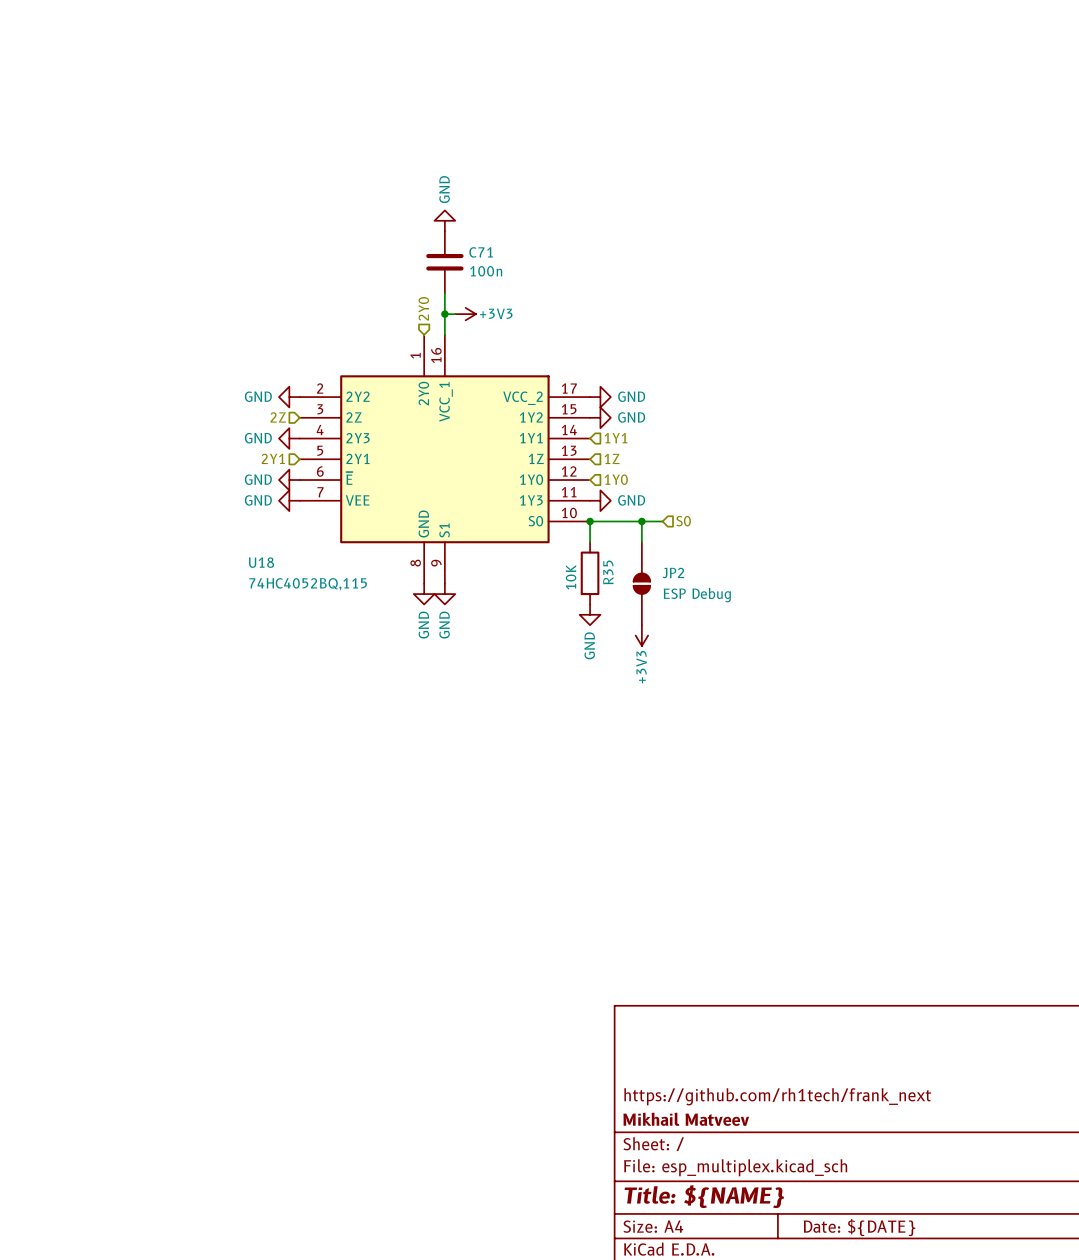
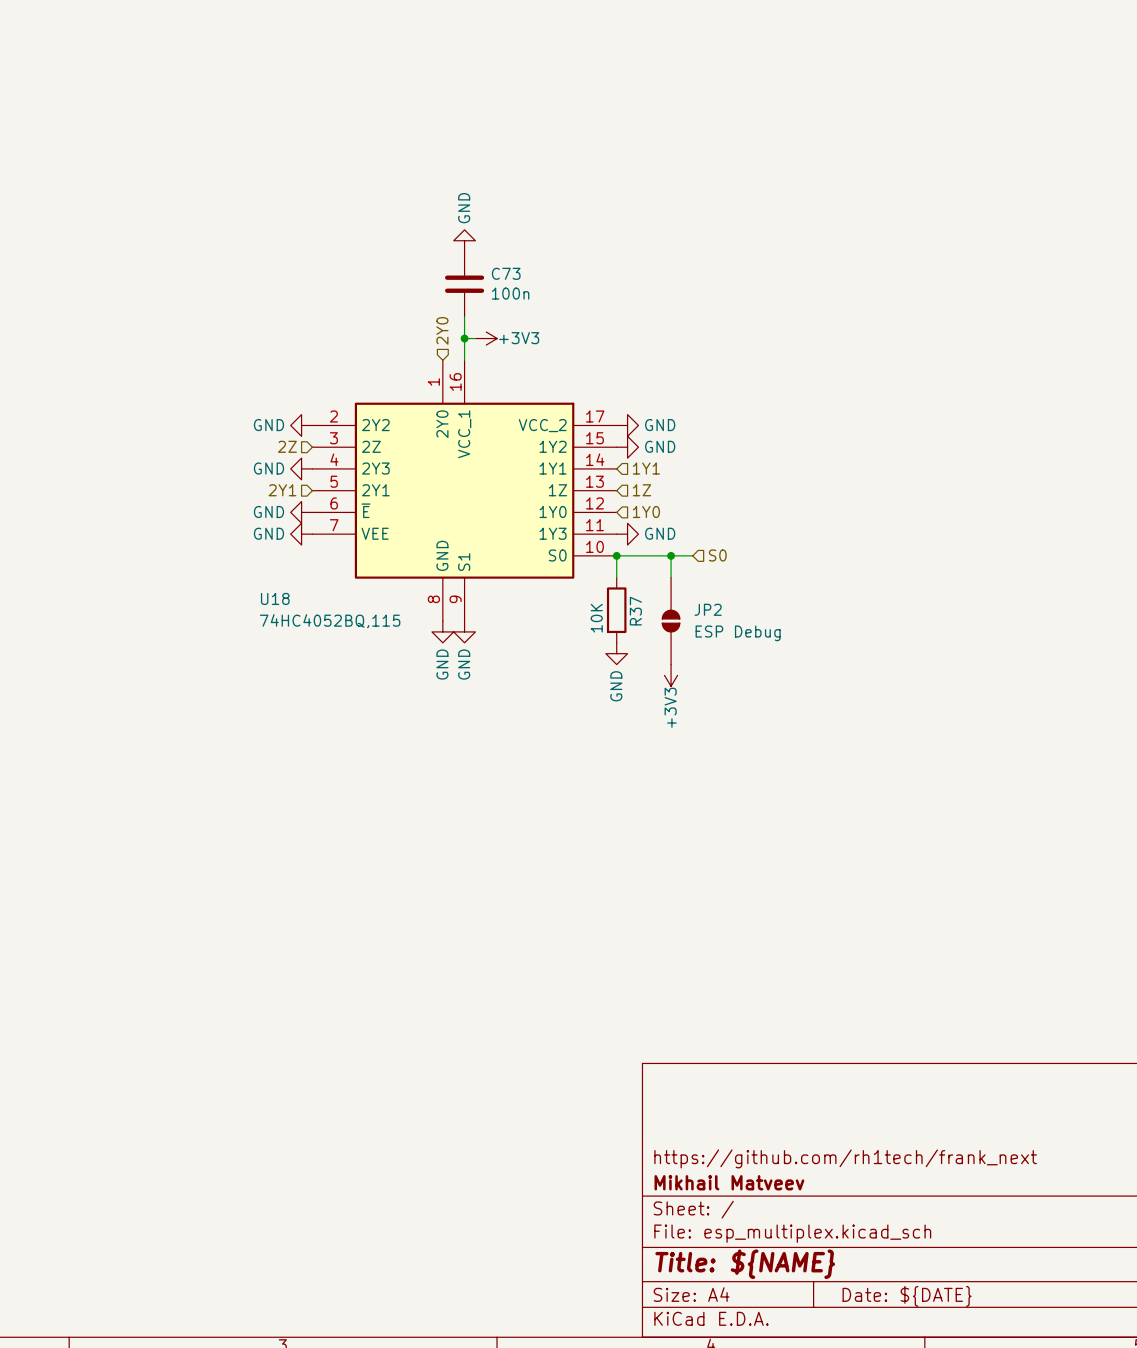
C71 name: C71 (481, 252) -> C73 (506, 273)
R35 name: R35 (608, 572) -> R37 (635, 611)

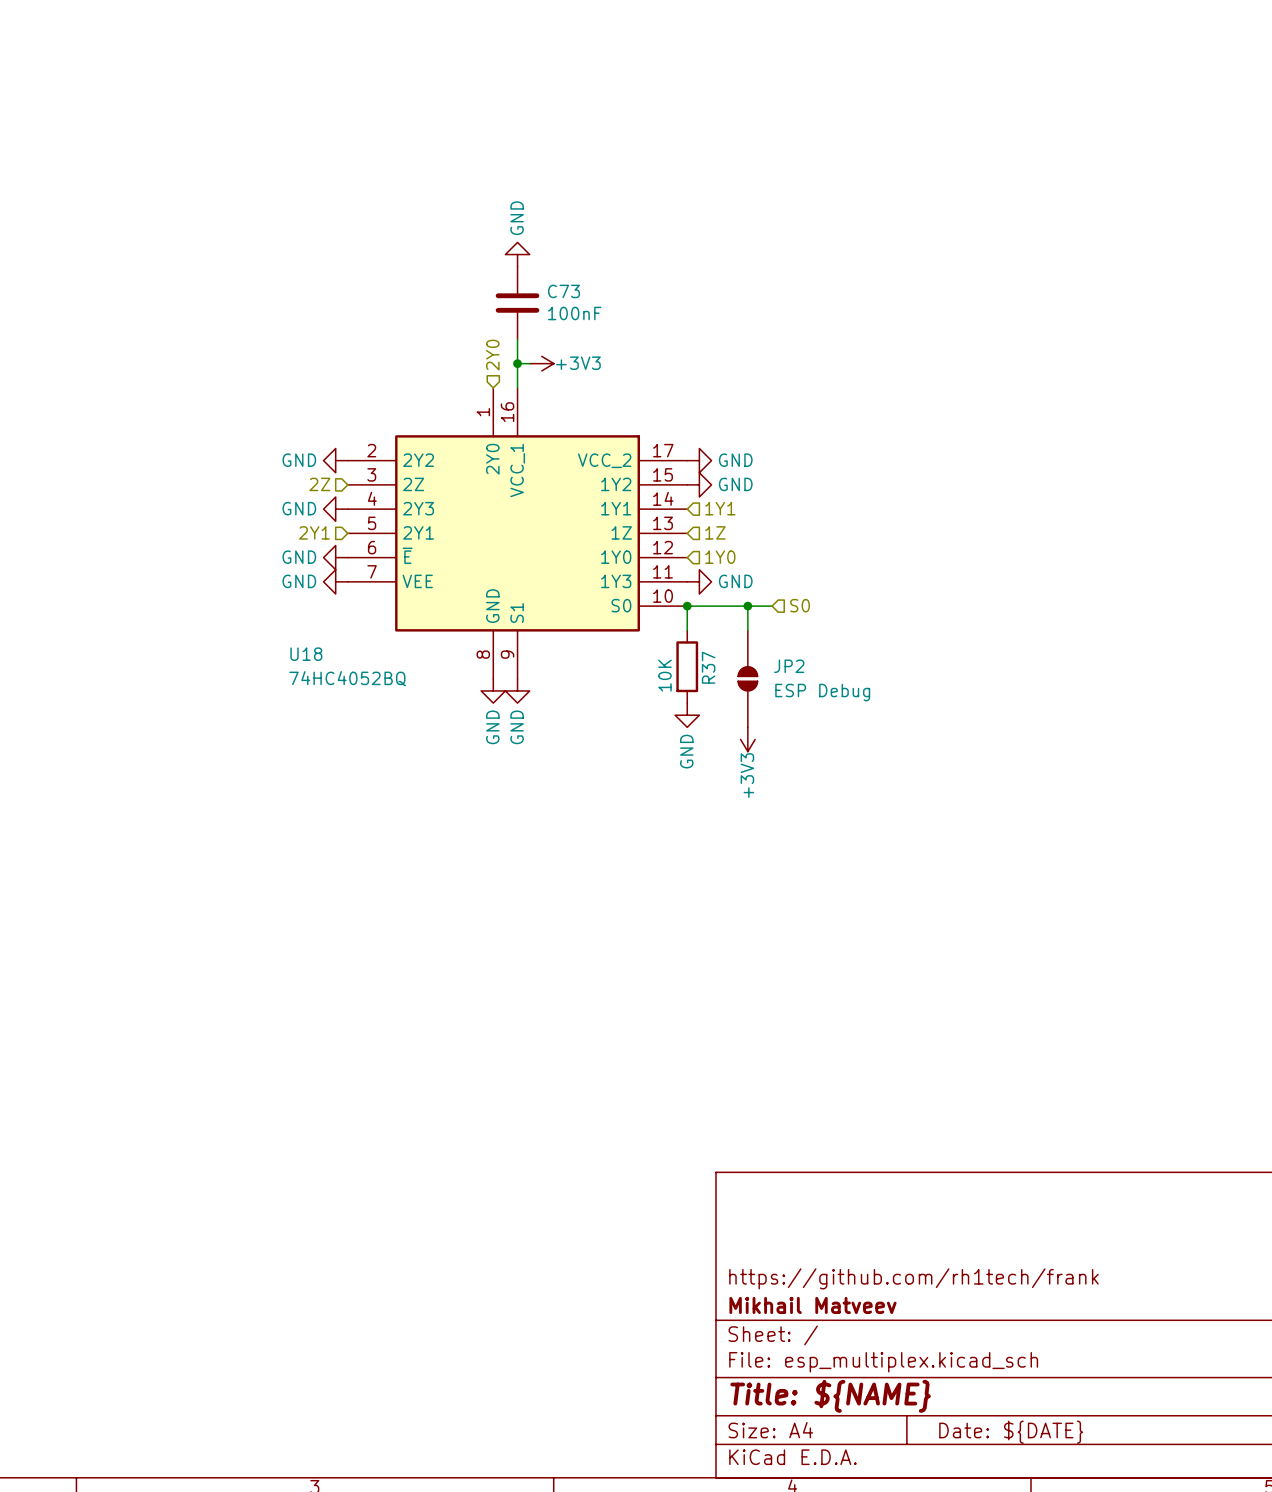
C73 value: 100n (510, 293) -> 100nF (574, 313)
U18 value: 74HC4052BQ,115 (330, 621) -> 74HC4052BQ (347, 678)
title block: https://github.com/rh1tech/frank_next (845, 1158) -> https://github.com/rh1tech/frank (913, 1278)

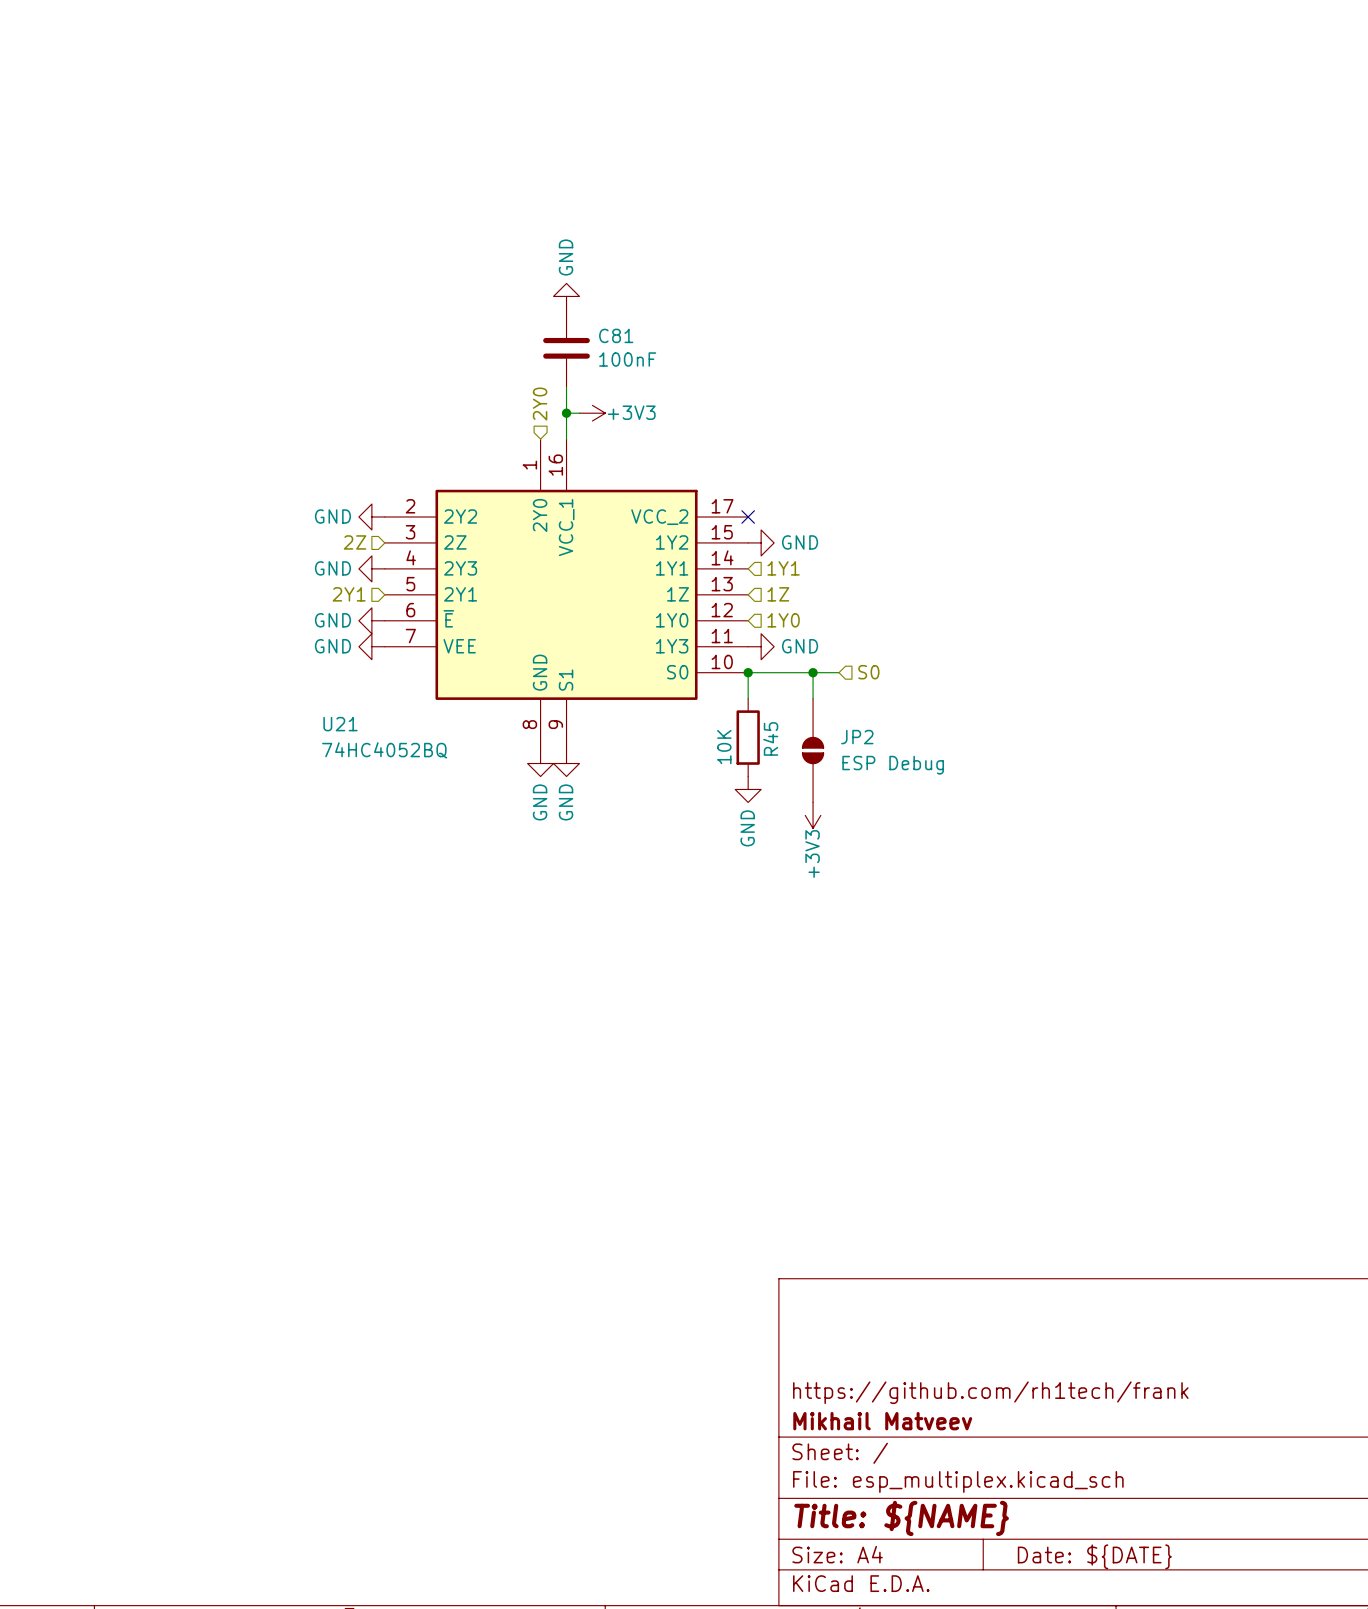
C73 name: C73 (563, 291) -> C81 (616, 335)
no-connect mark: none -> (748, 516)
power symbol: GND (699, 460) -> none
U18 name: U18 (306, 654) -> U21 (340, 724)
R37 name: R37 (708, 667) -> R45 (770, 738)

